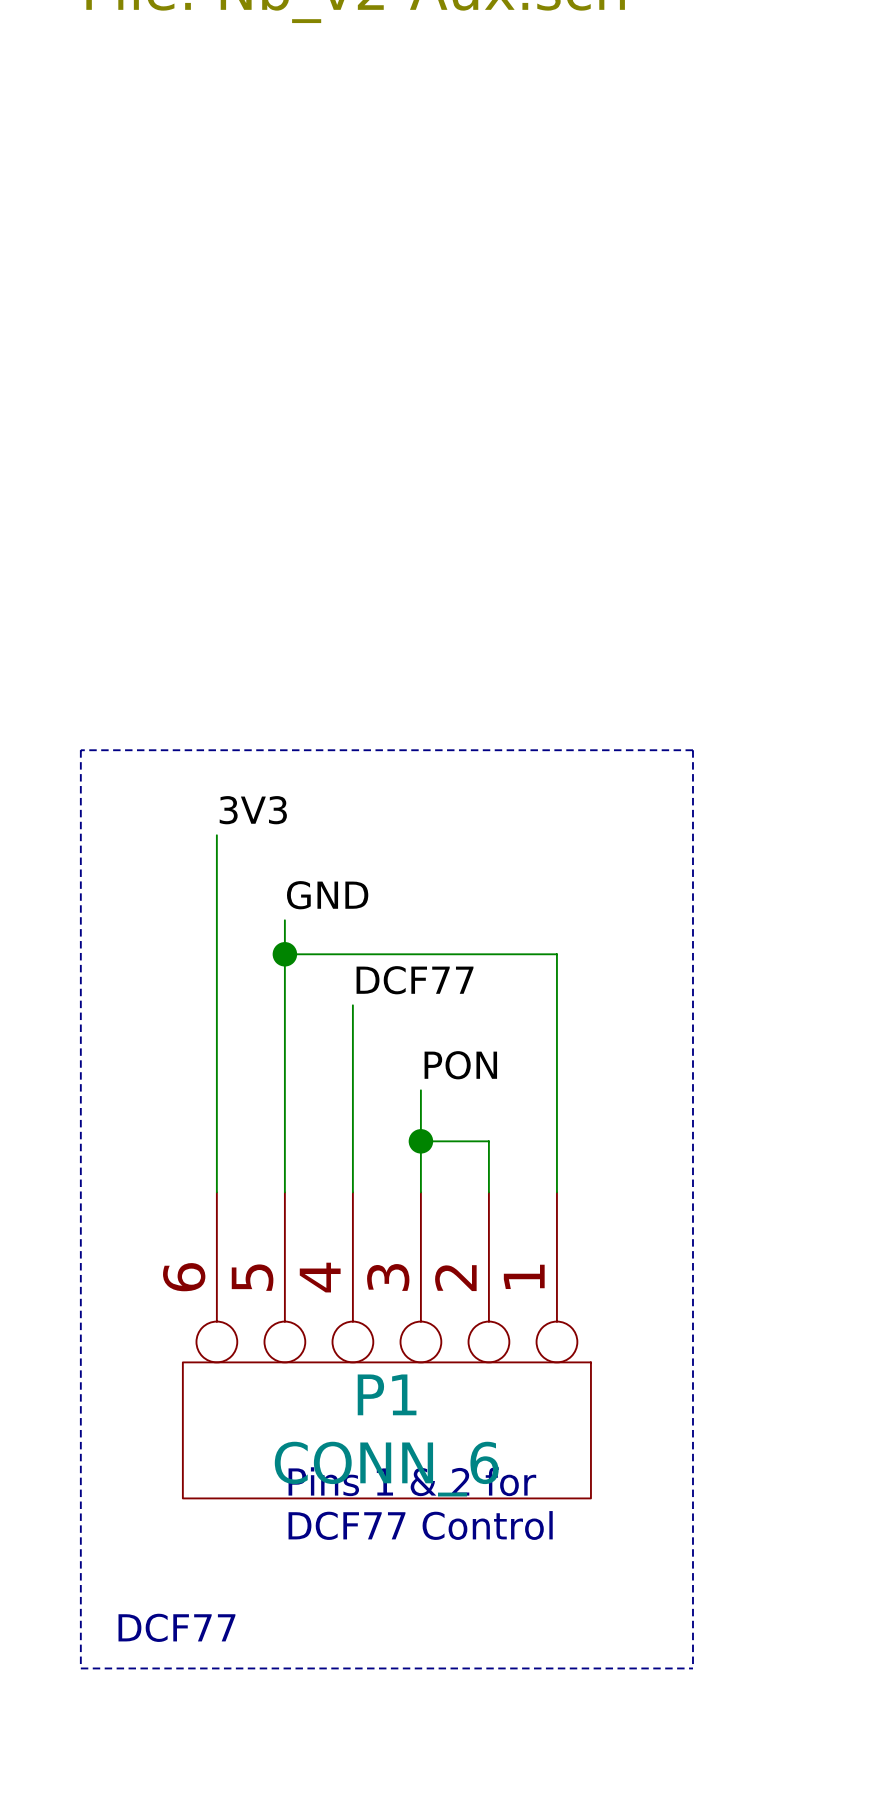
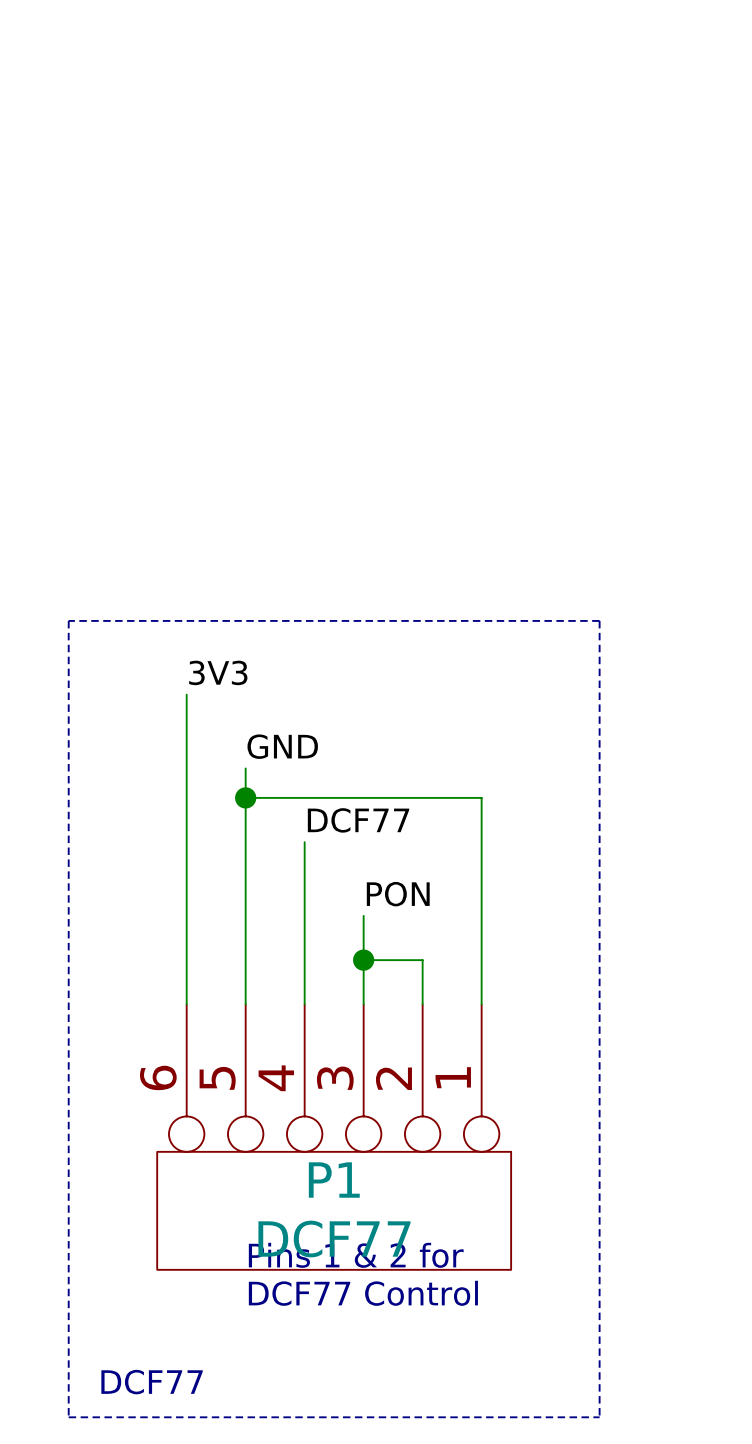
P1 value: CONN_6 (386, 1469) -> DCF77 (334, 1239)

